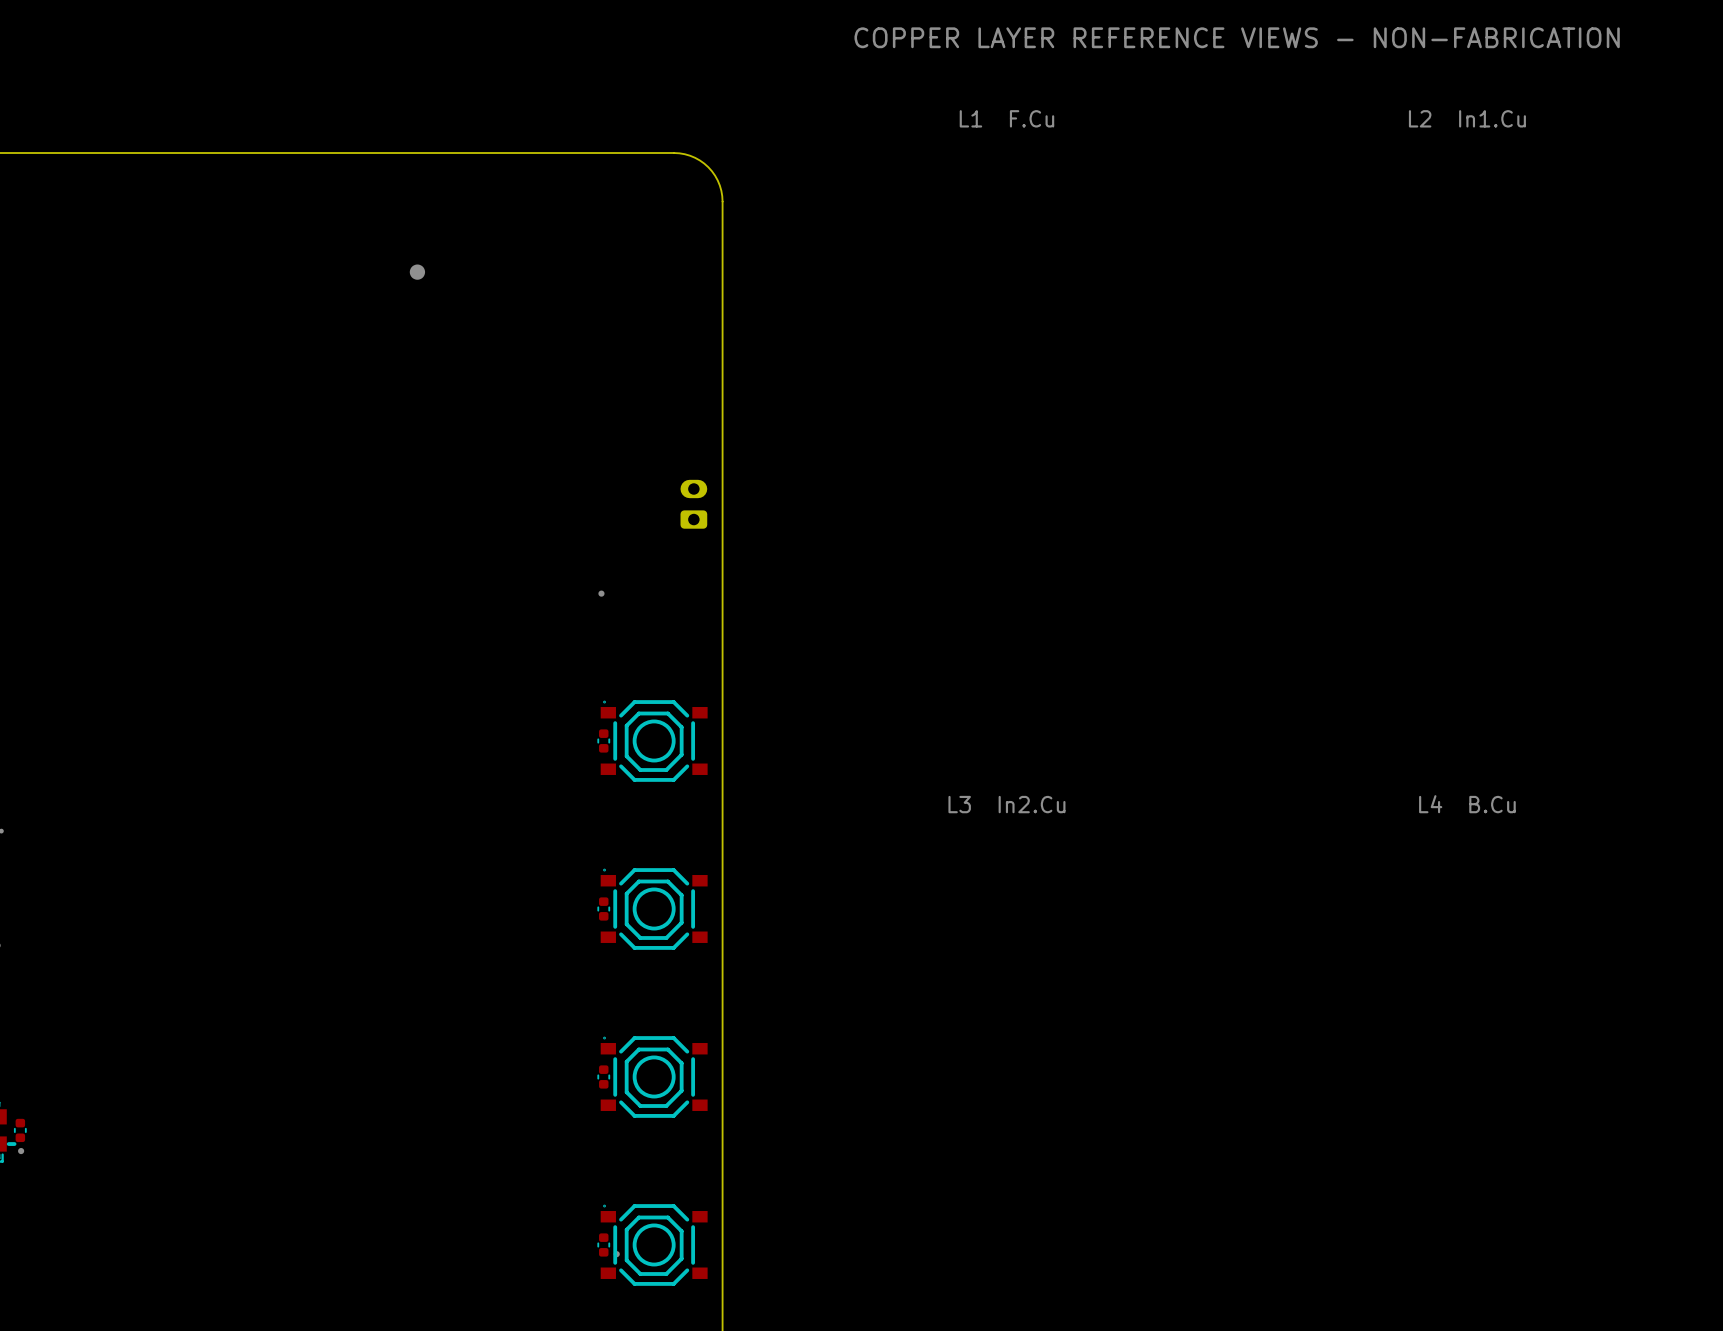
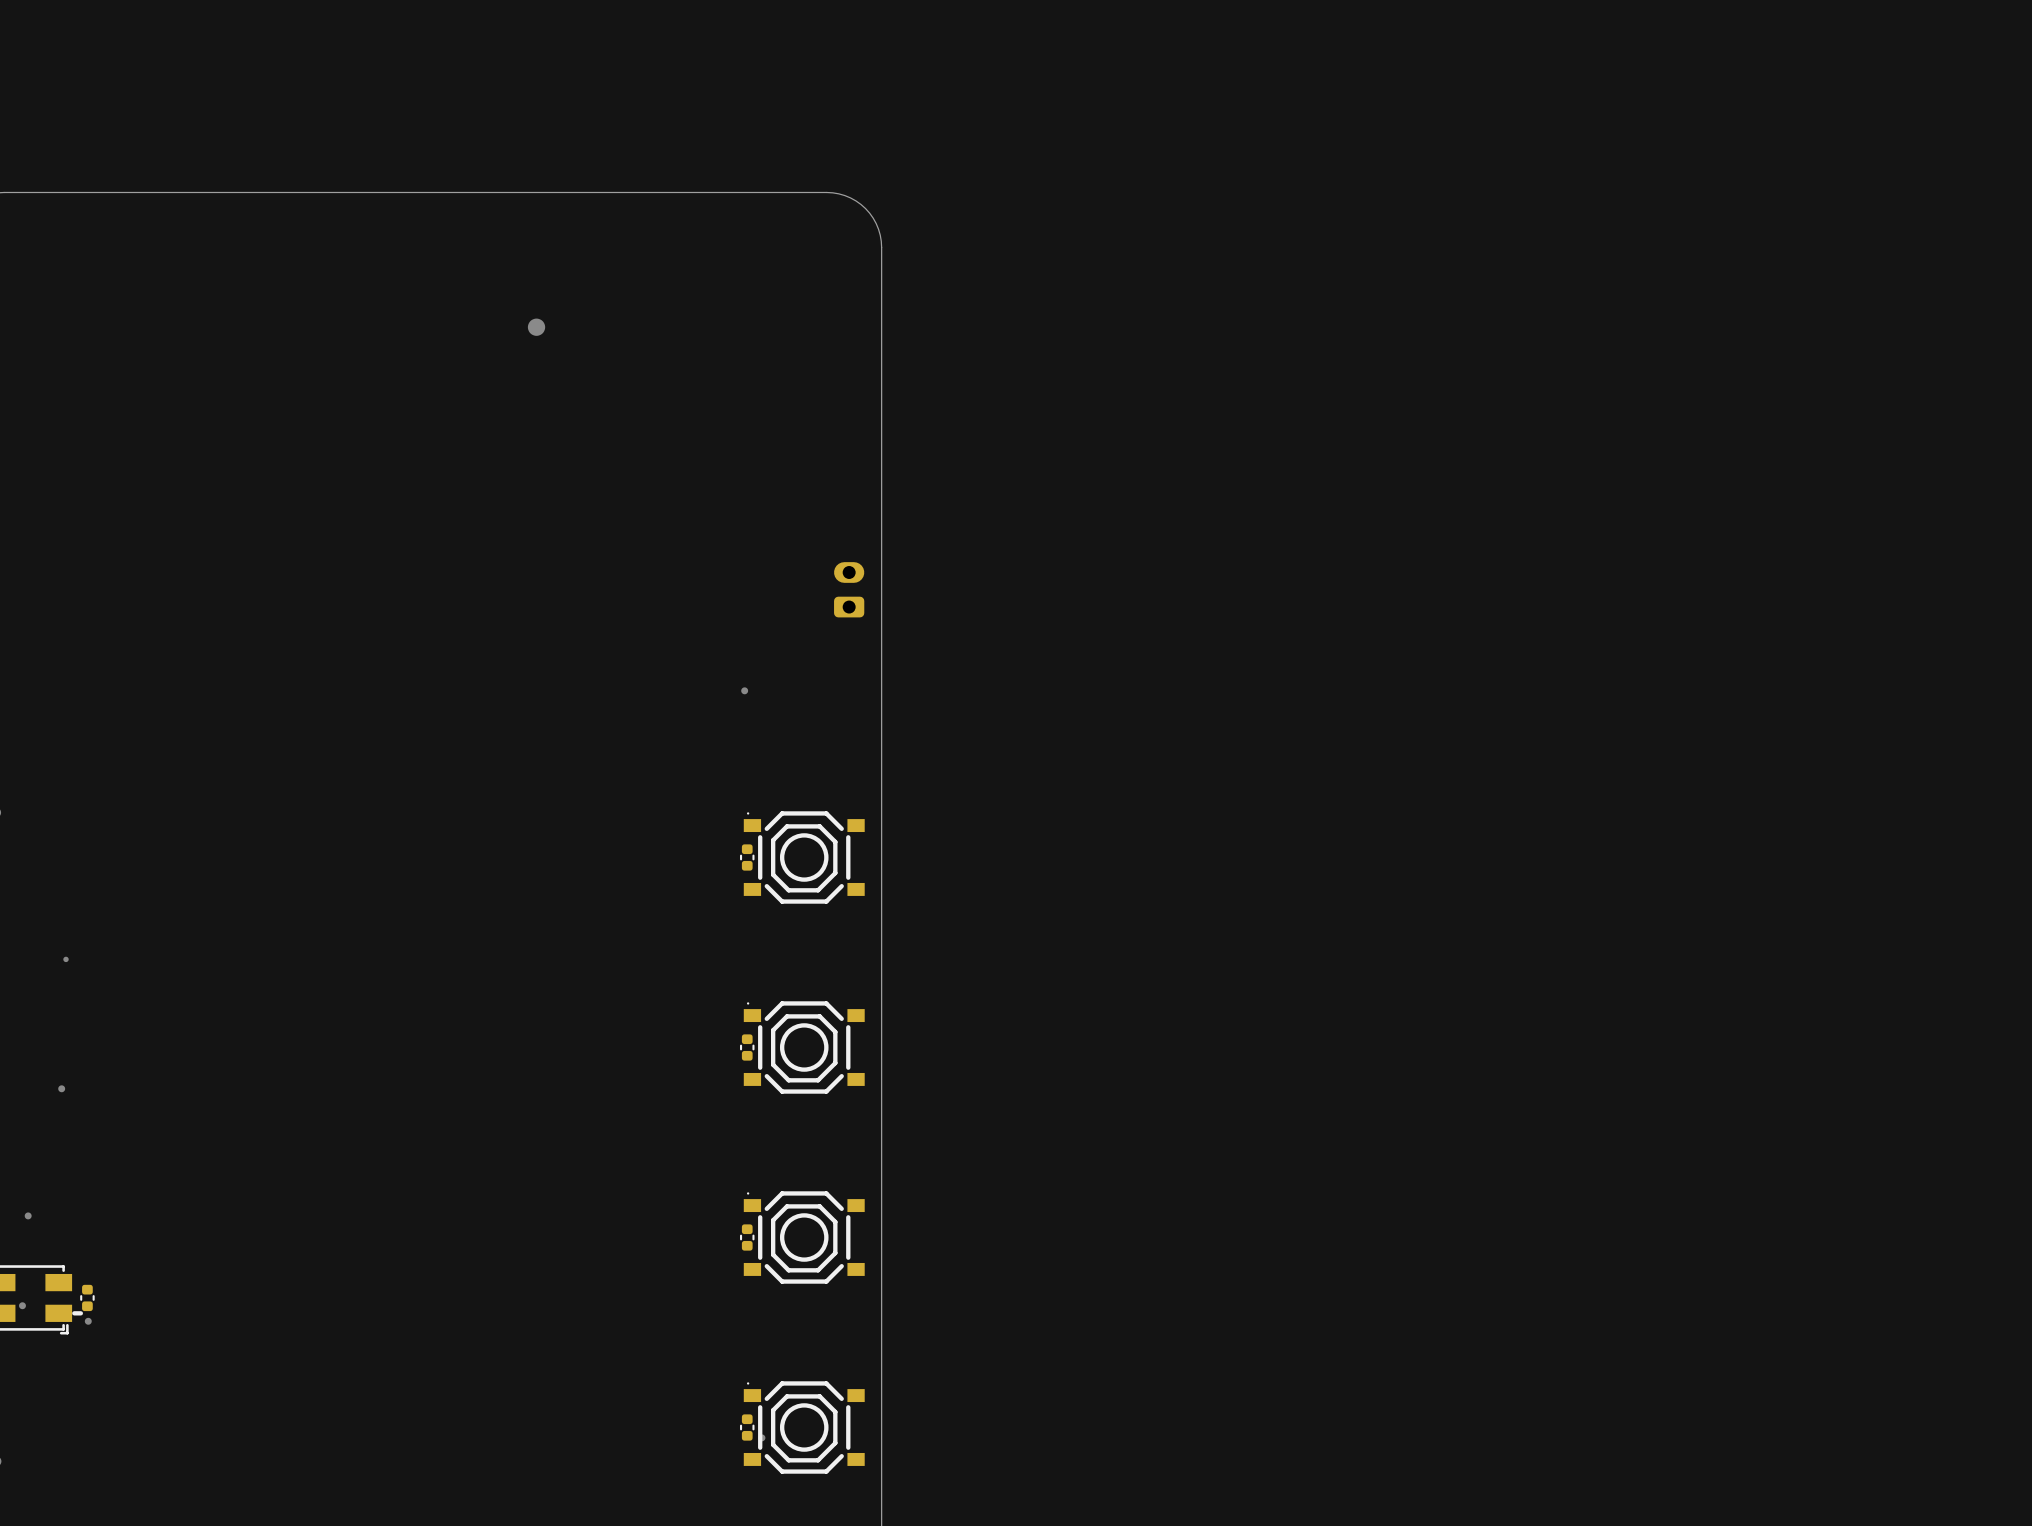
text: COPPER LAYER REFERENCE VIEWS - NON-FABRICATION (1237, 37) -> none
text: L1 F.Cu (1006, 118) -> none
text: L2 In1.Cu (1467, 118) -> none
text: L3 In2.Cu (1006, 804) -> none
text: L4 B.Cu (1467, 804) -> none

